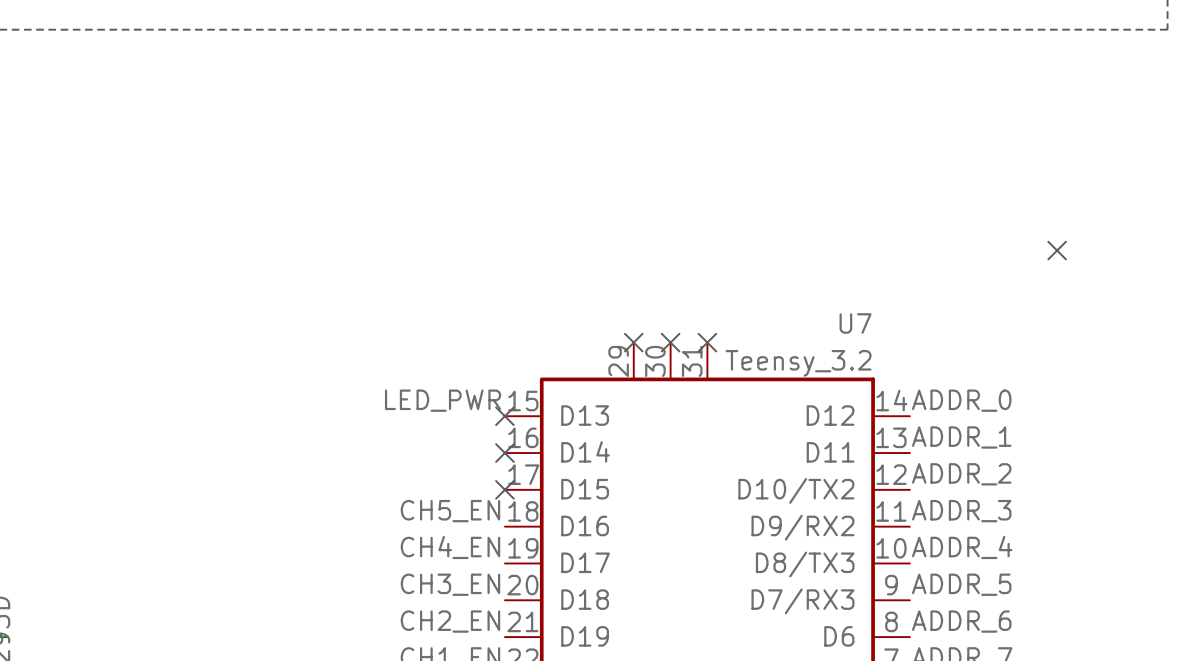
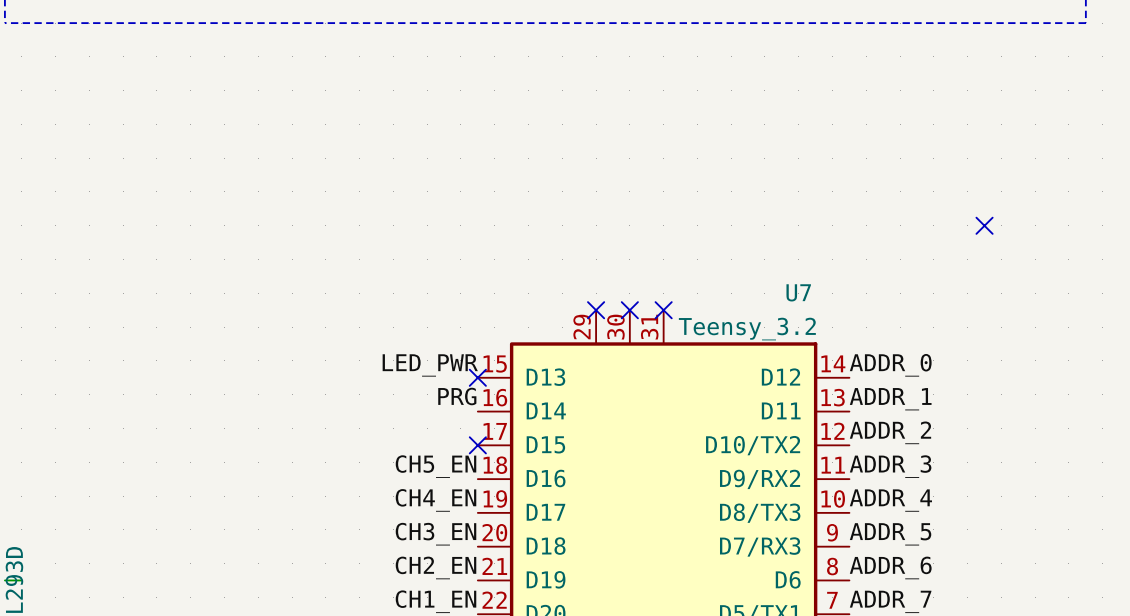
label: none -> PRG (457, 396)
no-connect mark: (504, 453) -> none

